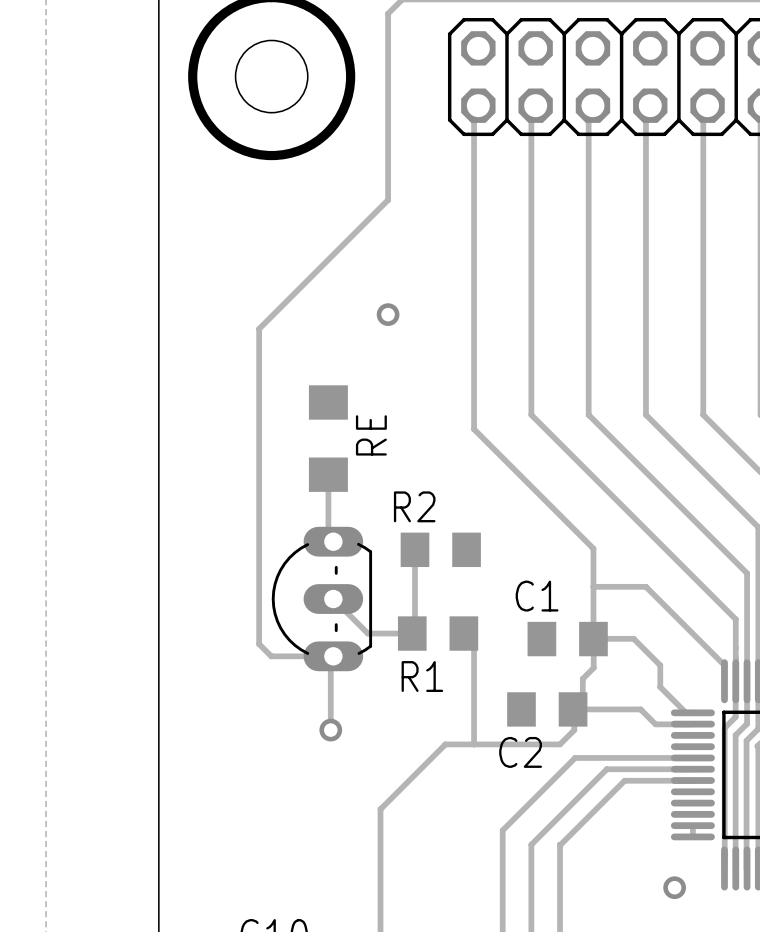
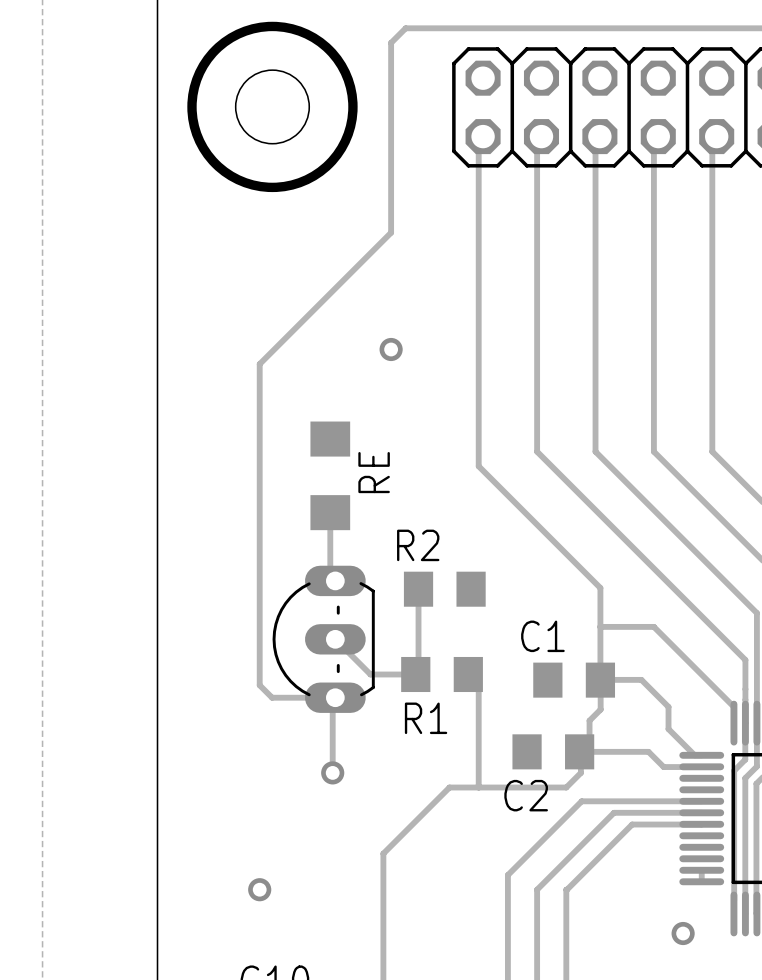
via: none -> (259, 889)

